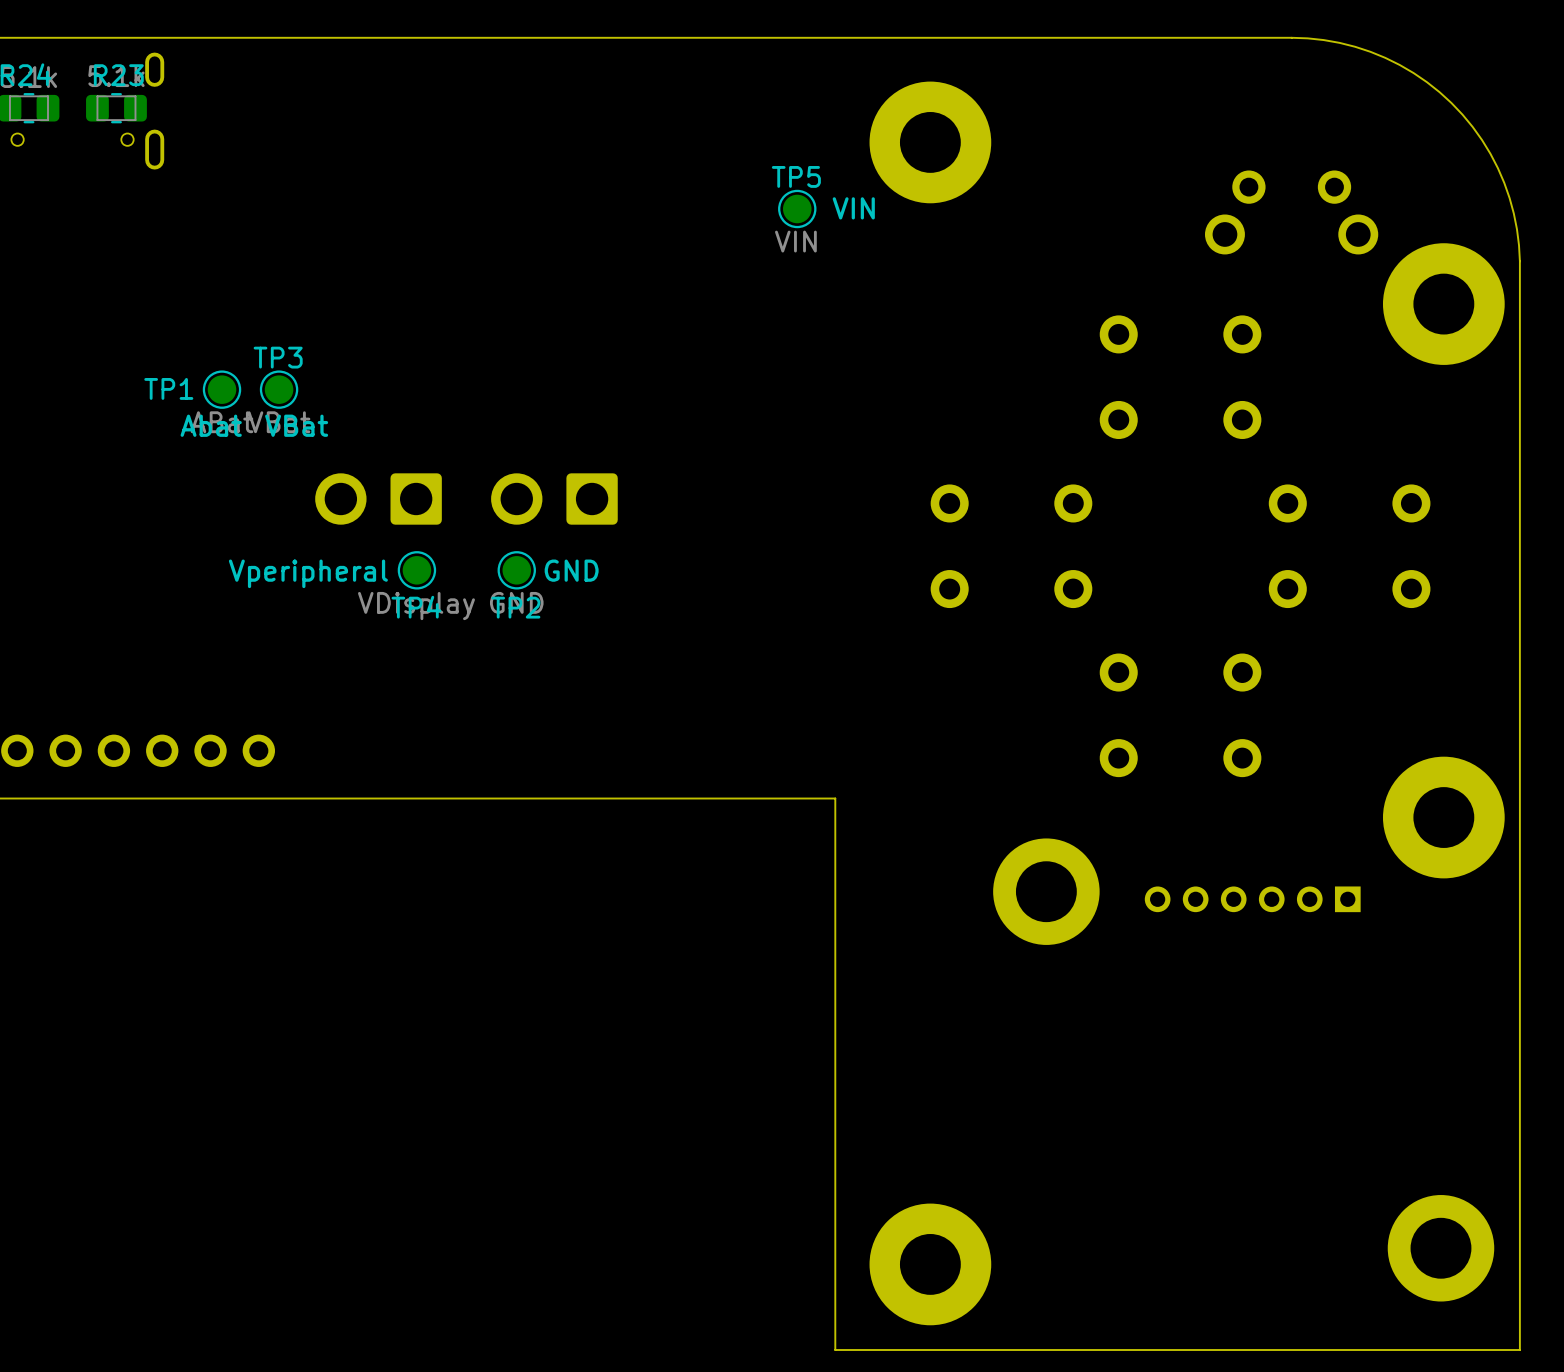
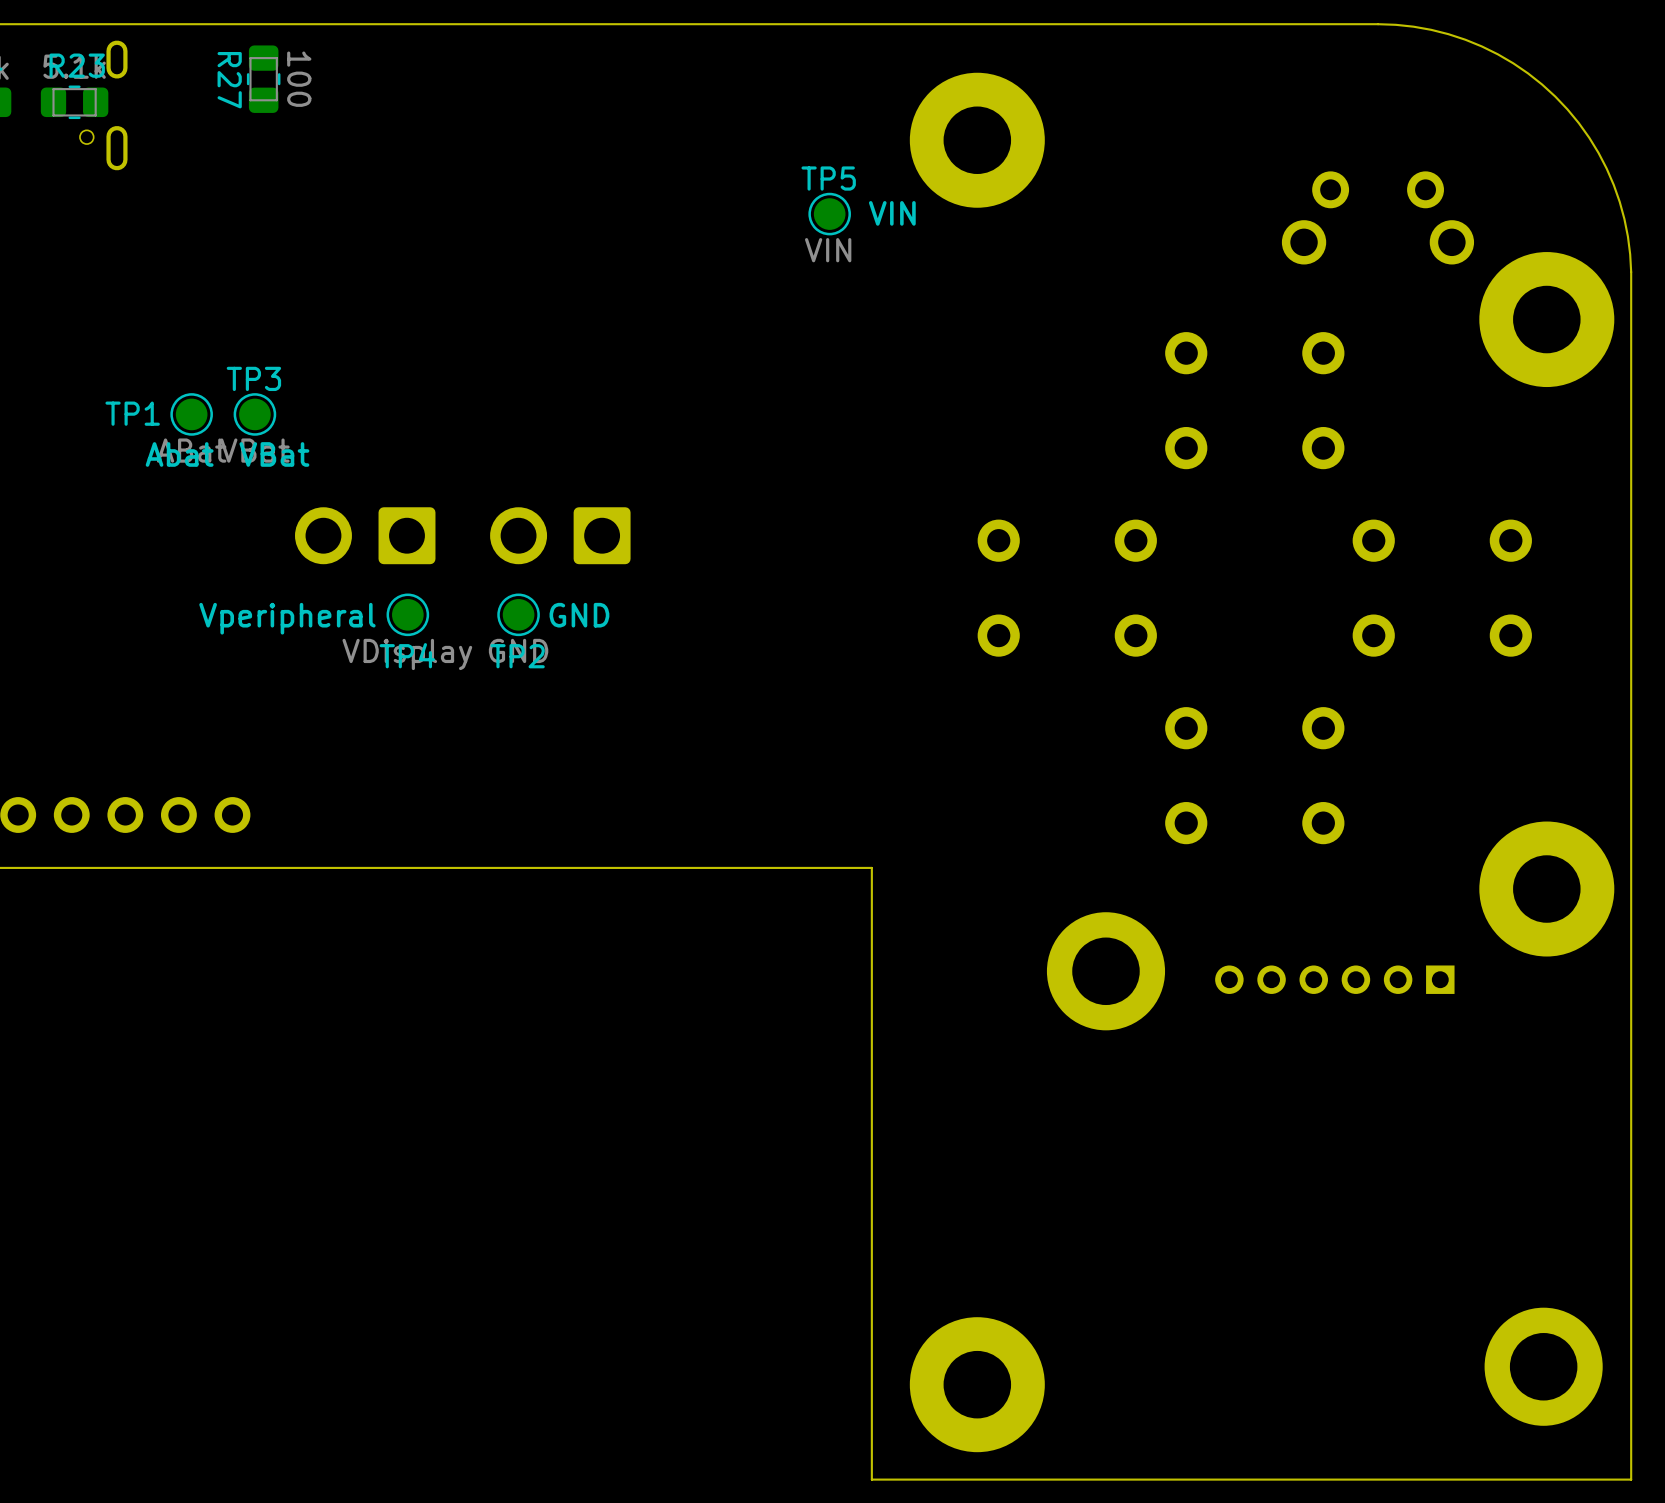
R27: none -> 100 (263, 79)

